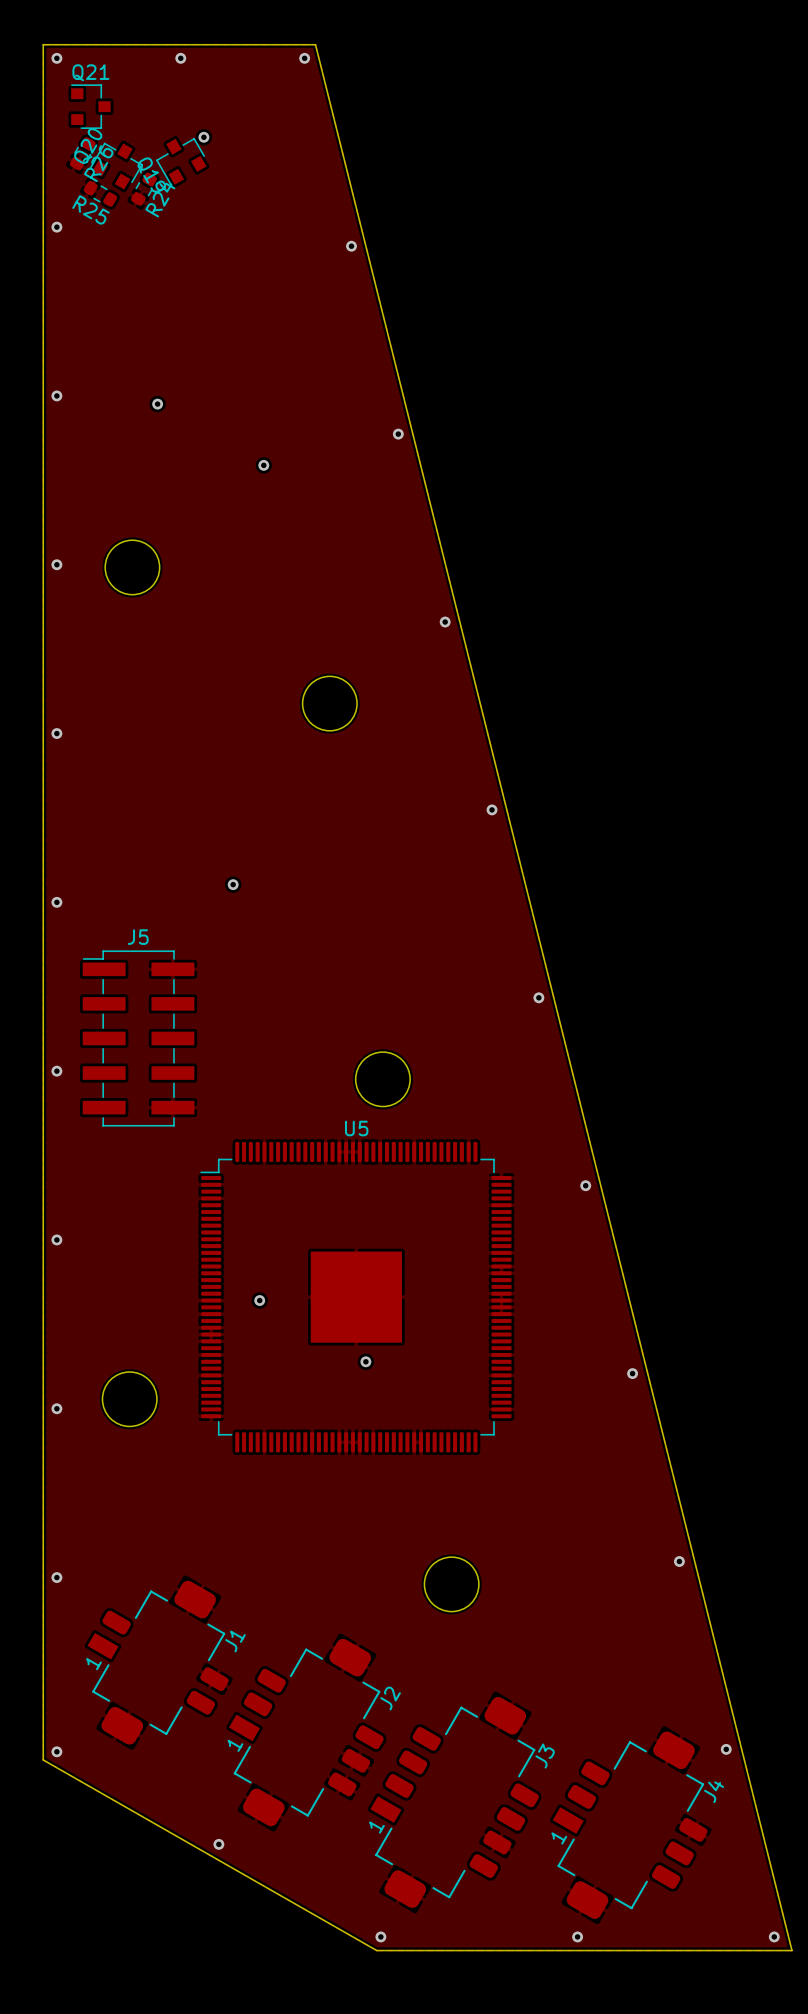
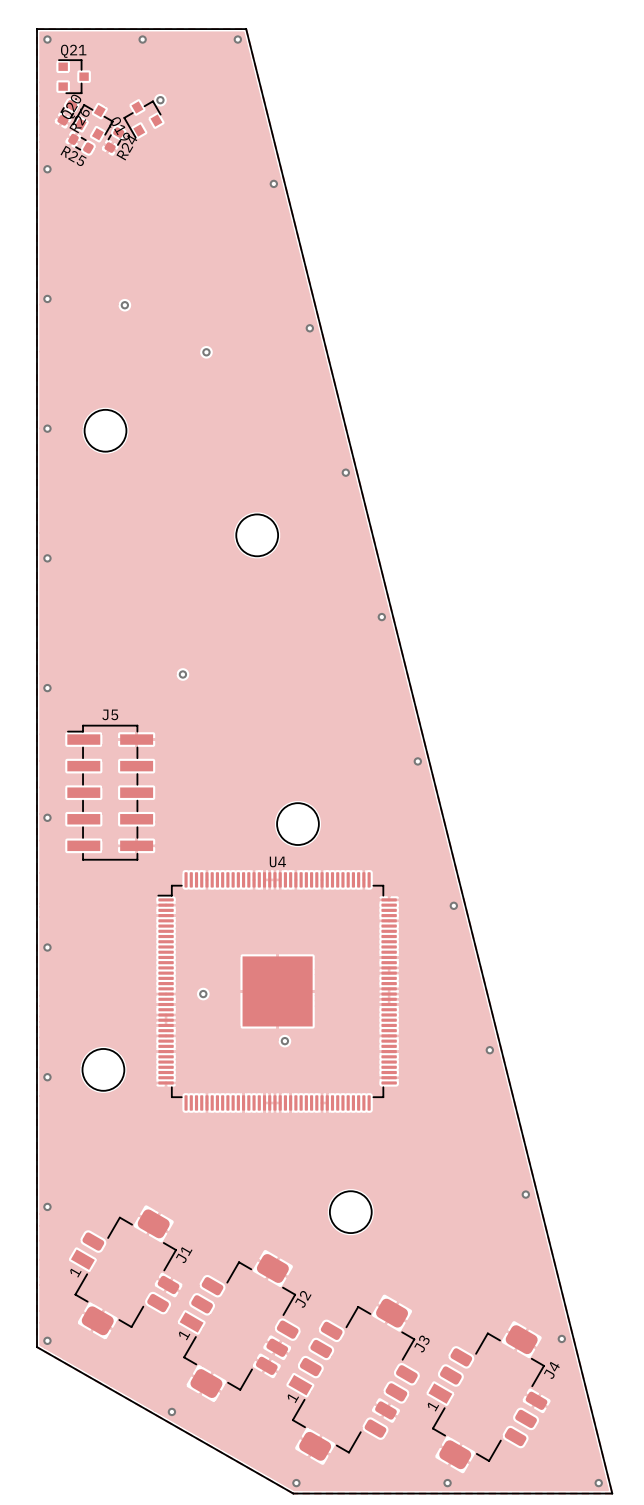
U5 name: U5 (356, 1128) -> U4 (277, 861)

